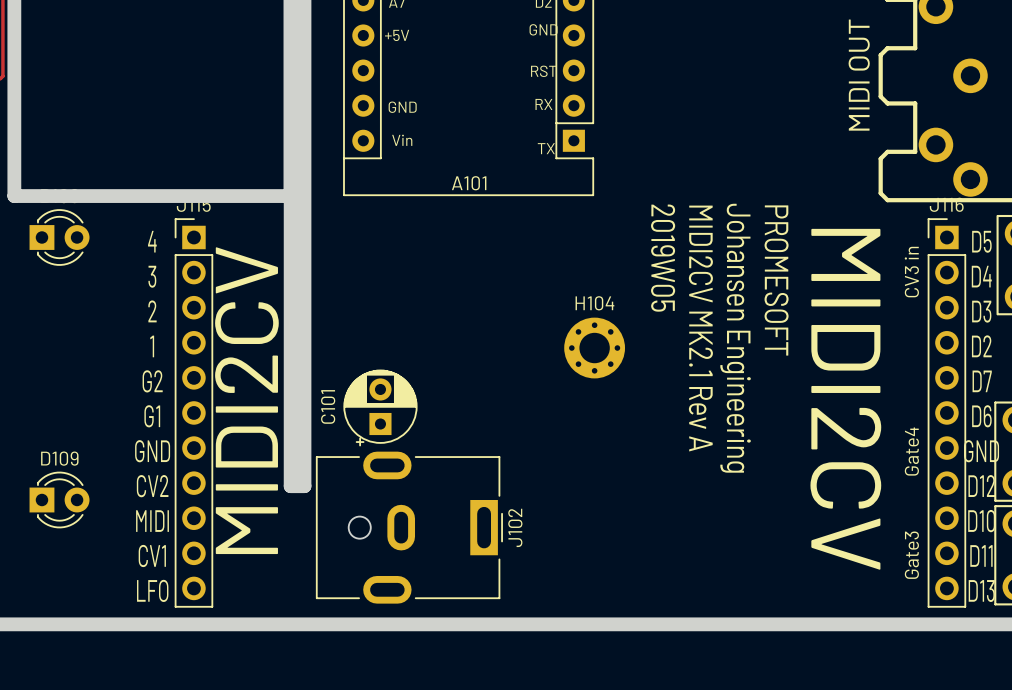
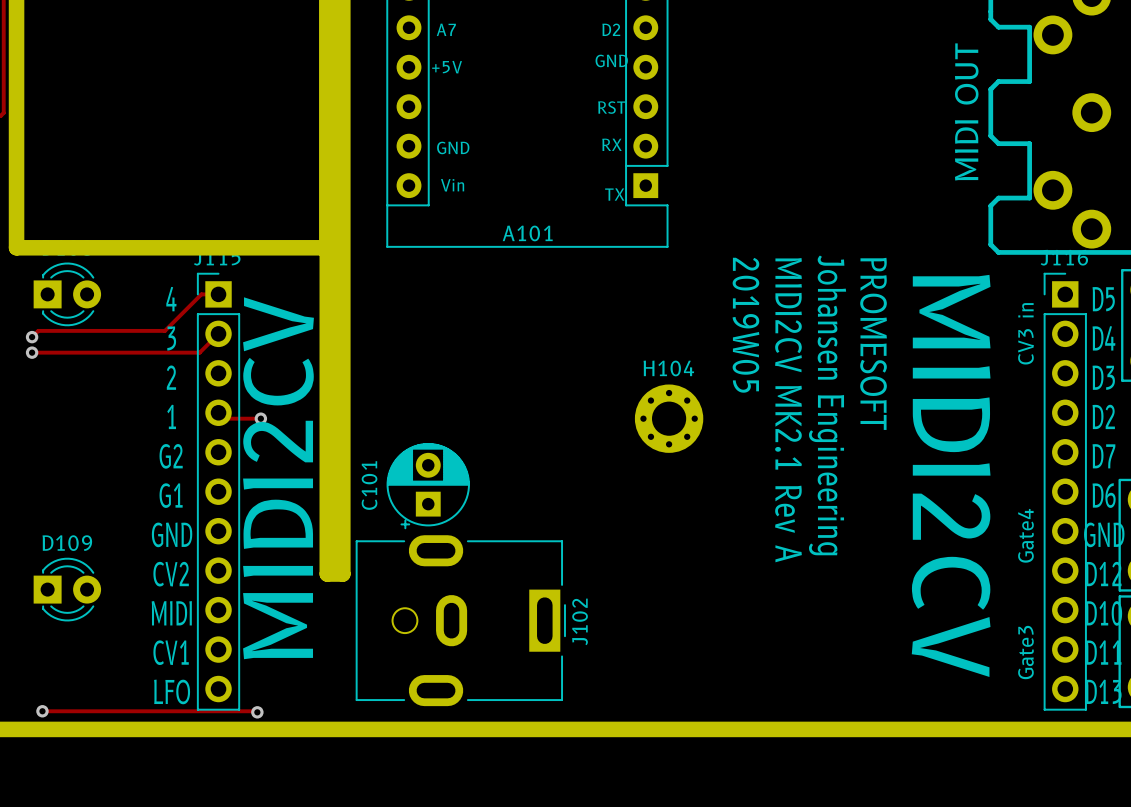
track: none -> (218, 294) (201, 294) (164, 330) (38, 330) (32, 337)
track: none -> (218, 333) (199, 352) (32, 352)
via: none -> (32, 337)
via: none -> (32, 352)
track: none -> (218, 412) (224, 418) (260, 418)
via: none -> (260, 418)
track: none -> (42, 711) (257, 712)
via: none -> (42, 711)
via: none -> (257, 712)

